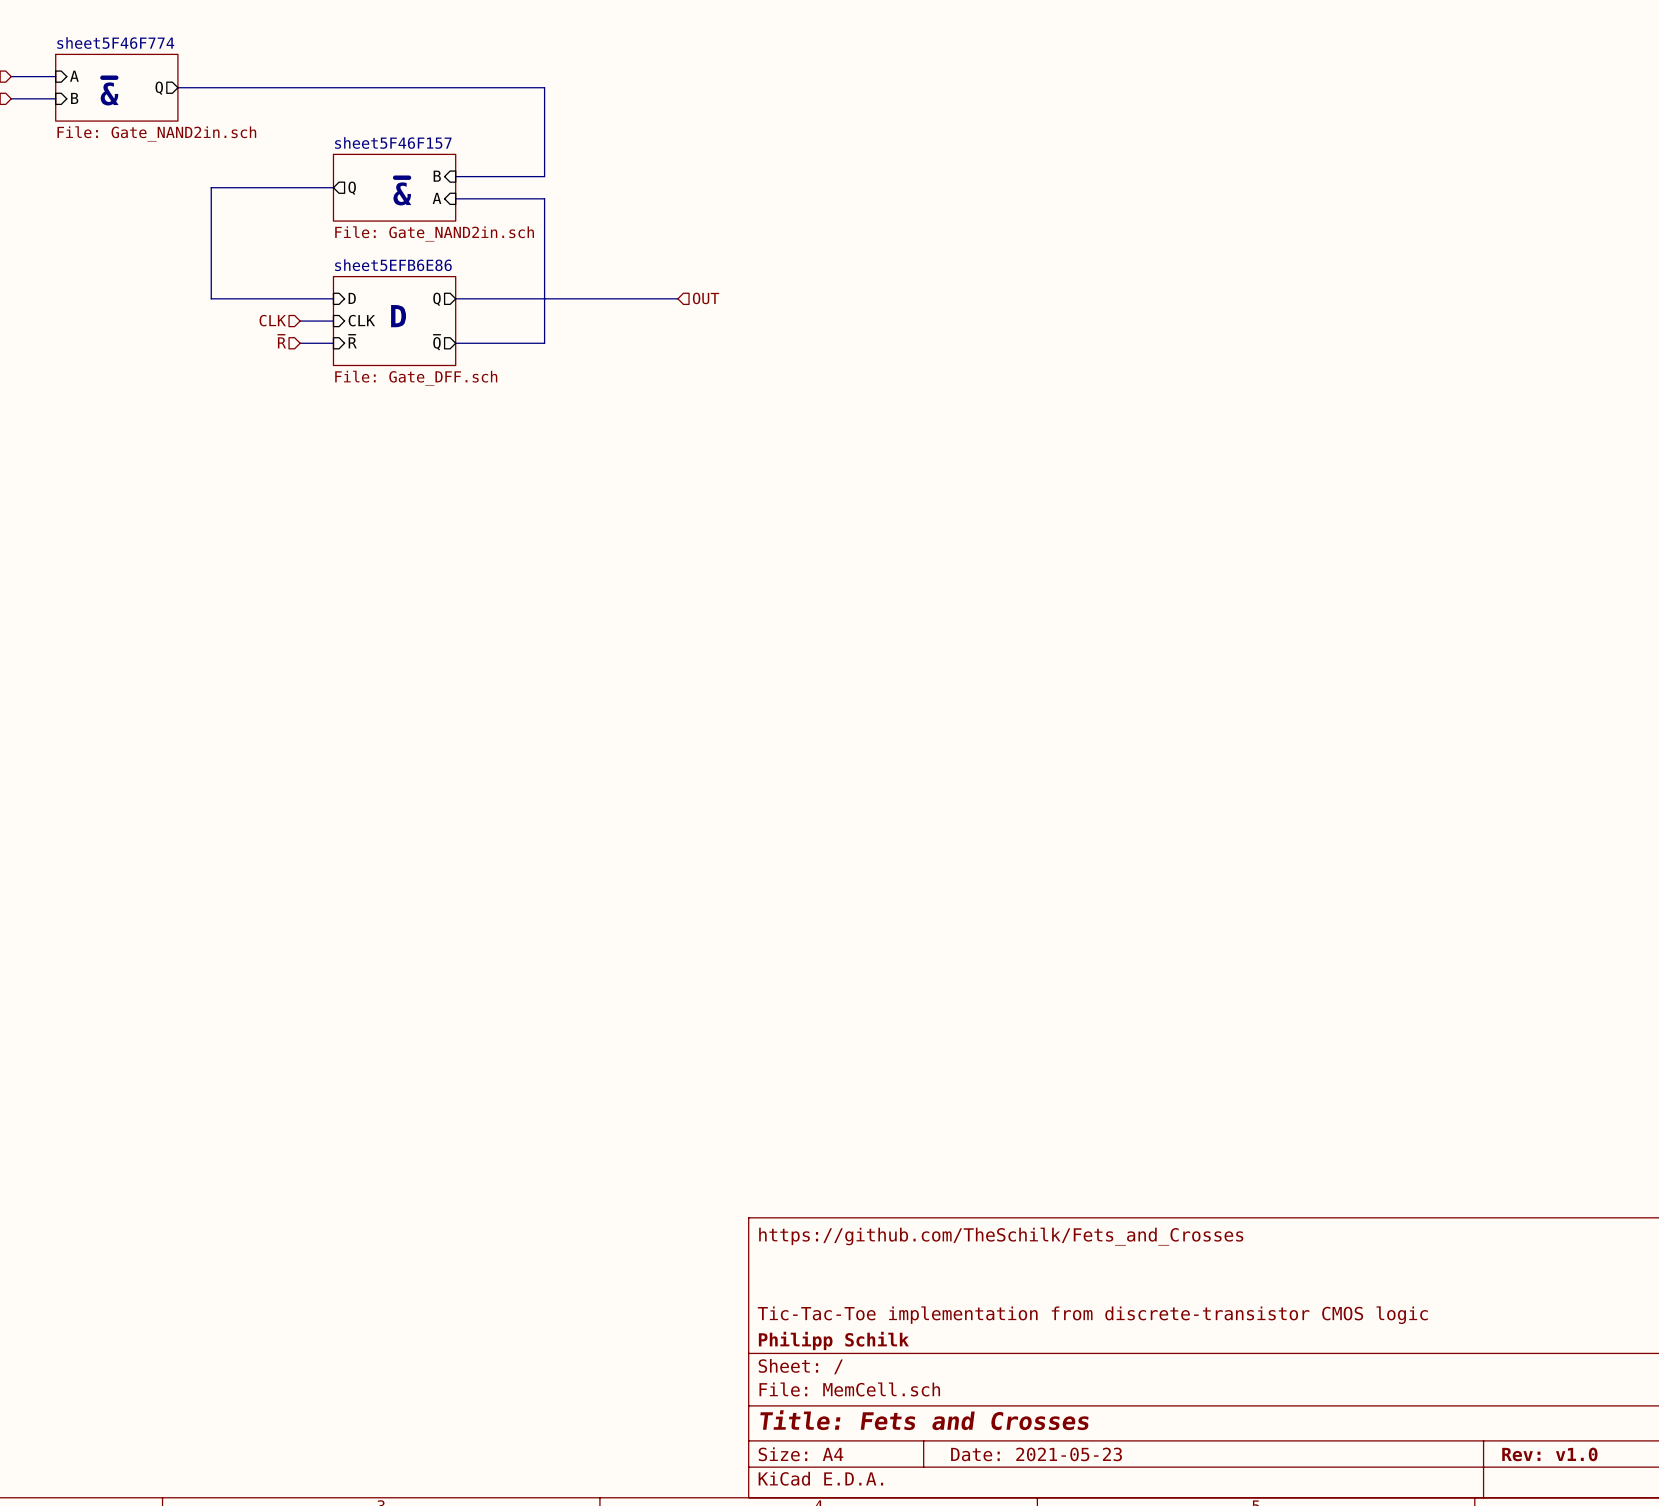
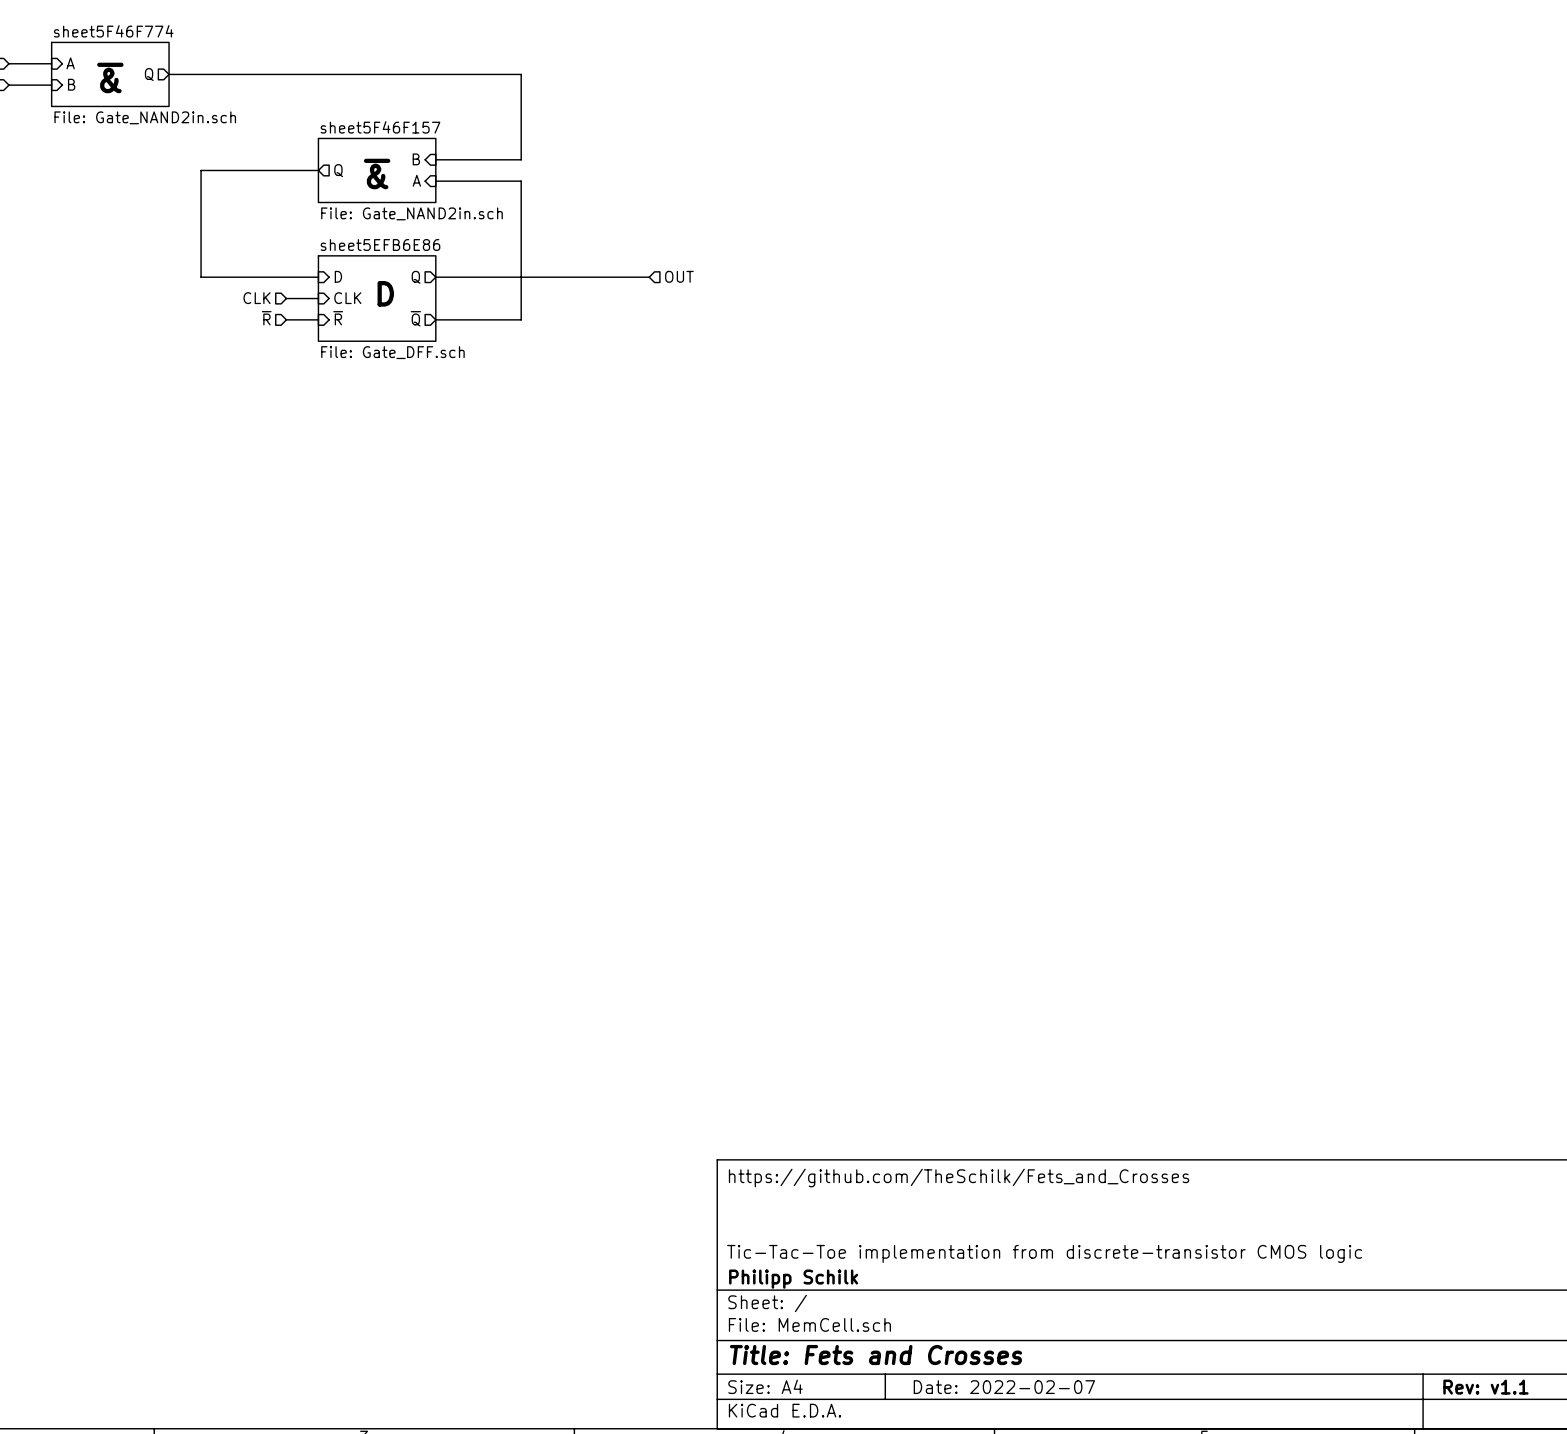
title block: Date: 2021-05-23 (1036, 1454) -> Date: 2022-02-07 (1004, 1387)
title block: Rev: v1.0 (1549, 1454) -> Rev: v1.1 (1485, 1387)

